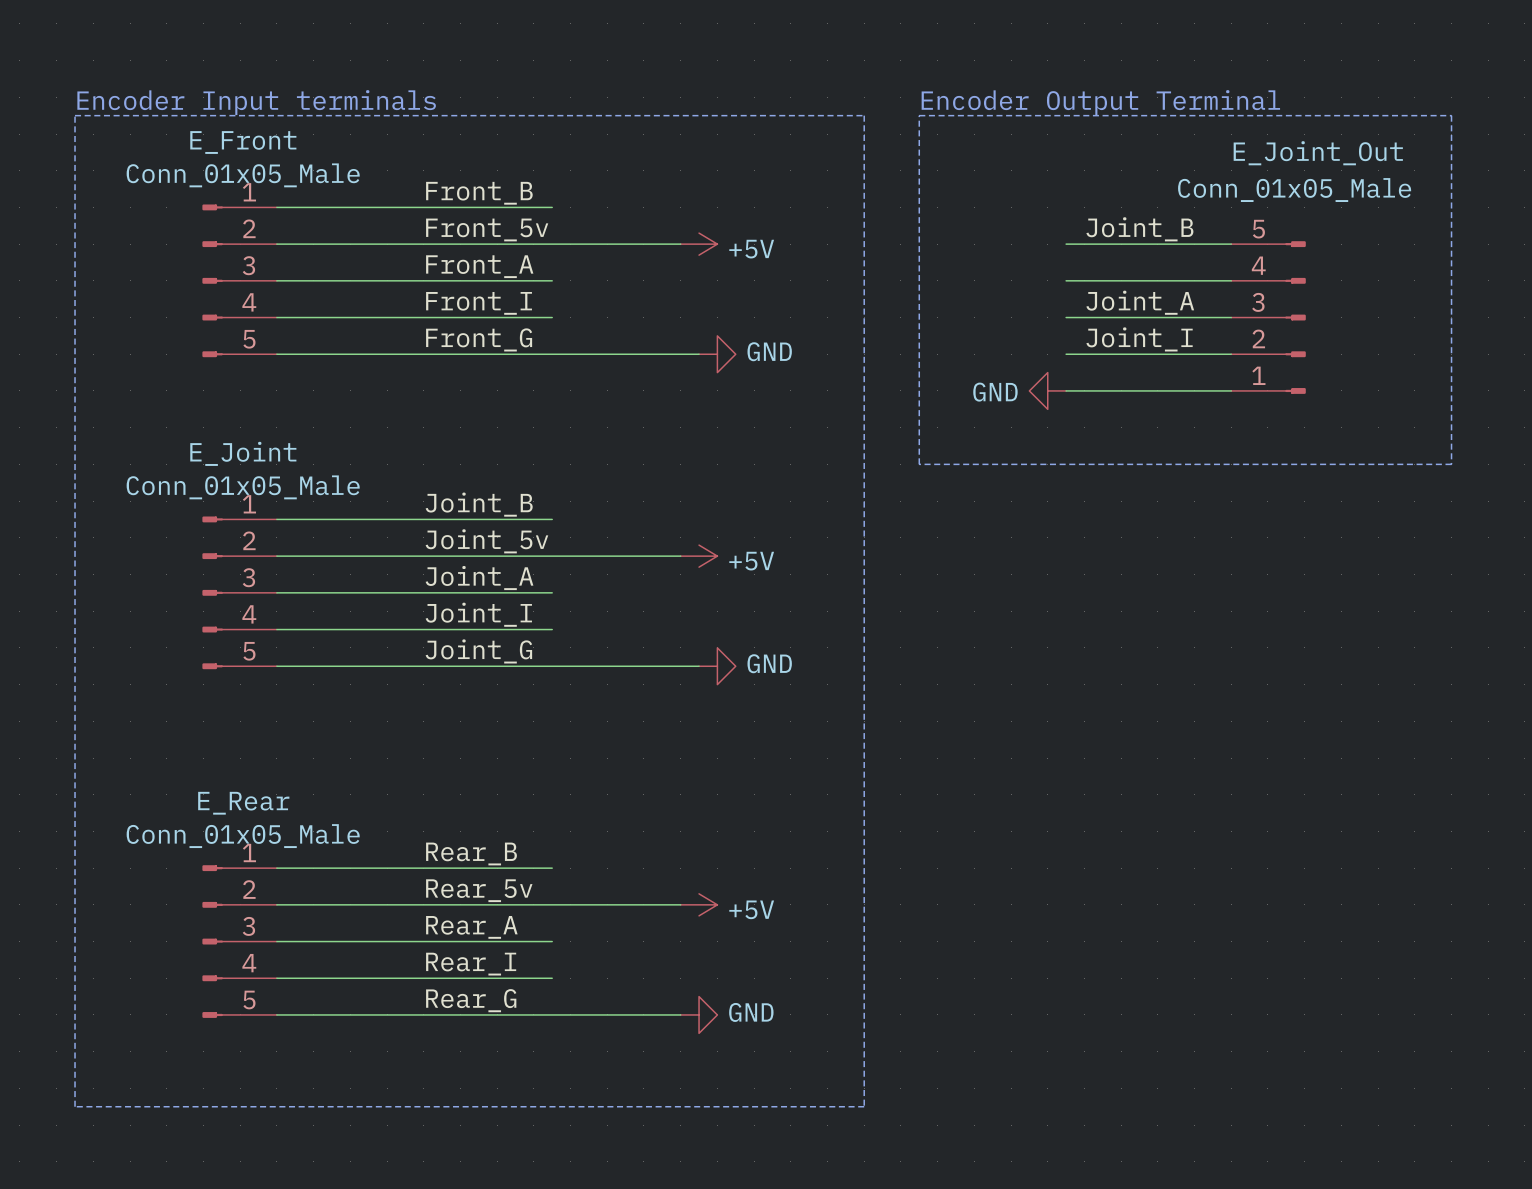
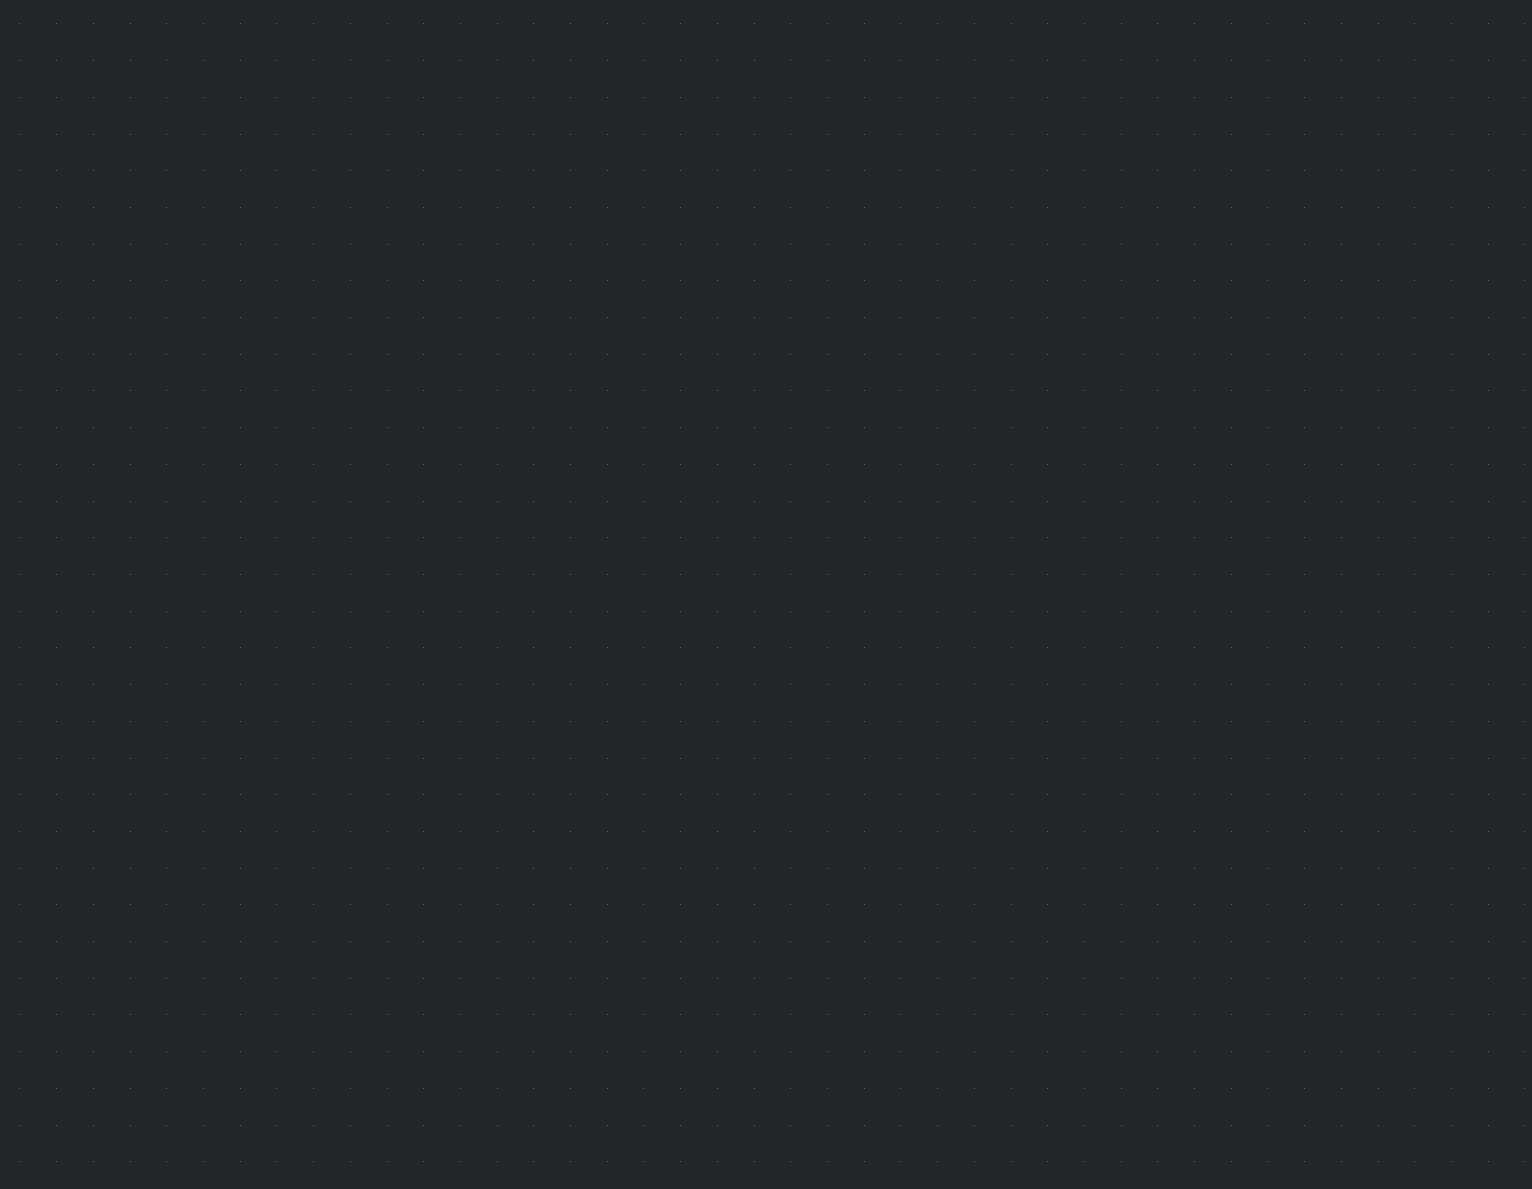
text: Encoder Input terminals (256, 102) -> none
text: Encoder Output Terminal (1100, 102) -> none
line: (75, 115) (864, 115) (864, 1106) (75, 1106) (75, 115) -> none
line: (919, 115) (1451, 115) (1451, 464) (919, 464) (919, 115) -> none
label: Front_B (479, 193) -> none
wire: (276, 207) (552, 207) -> none
label: Front_5v (487, 229) -> none
label: Joint_B (1139, 229) -> none
wire: (276, 244) (680, 244) -> none
power symbol: +5V (699, 244) -> none
wire: (1066, 244) (1231, 244) -> none
label: Front_A (479, 266) -> none
E_Front: Conn_01x05_Male (239, 280) -> none
wire: (276, 280) (552, 280) -> none
wire: (1066, 280) (1231, 280) -> none
label: Joint_A (1140, 302) -> none
label: Front_I (479, 303) -> none
wire: (276, 317) (552, 317) -> none
wire: (1066, 317) (1231, 317) -> none
E_Joint_Out: Conn_01x05_Male (1268, 317) -> none
label: Front_G (479, 339) -> none
label: Joint_I (1139, 339) -> none
wire: (276, 354) (699, 354) -> none
power symbol: GND (717, 354) -> none
wire: (1066, 354) (1231, 354) -> none
power symbol: GND (1047, 390) -> none
wire: (1066, 390) (1231, 390) -> none
label: Joint_B (479, 504) -> none
wire: (276, 519) (552, 519) -> none
label: Joint_5v (486, 541) -> none
wire: (276, 556) (680, 556) -> none
power symbol: +5V (699, 556) -> none
label: Joint_A (479, 578) -> none
E_Joint: Conn_01x05_Male (239, 592) -> none
wire: (276, 592) (552, 592) -> none
label: Joint_I (478, 614) -> none
wire: (276, 629) (552, 629) -> none
label: Joint_G (478, 651) -> none
wire: (276, 666) (699, 666) -> none
power symbol: GND (717, 666) -> none
label: Rear_B (471, 853) -> none
wire: (276, 868) (552, 868) -> none
label: Rear_5v (479, 890) -> none
wire: (276, 904) (680, 904) -> none
power symbol: +5V (699, 904) -> none
label: Rear_A (471, 927) -> none
E_Rear: Conn_01x05_Male (239, 941) -> none
wire: (276, 941) (552, 941) -> none
label: Rear_I (471, 964) -> none
wire: (276, 978) (552, 978) -> none
label: Rear_G (471, 1000) -> none
wire: (276, 1014) (680, 1014) -> none
power symbol: GND (699, 1014) -> none

